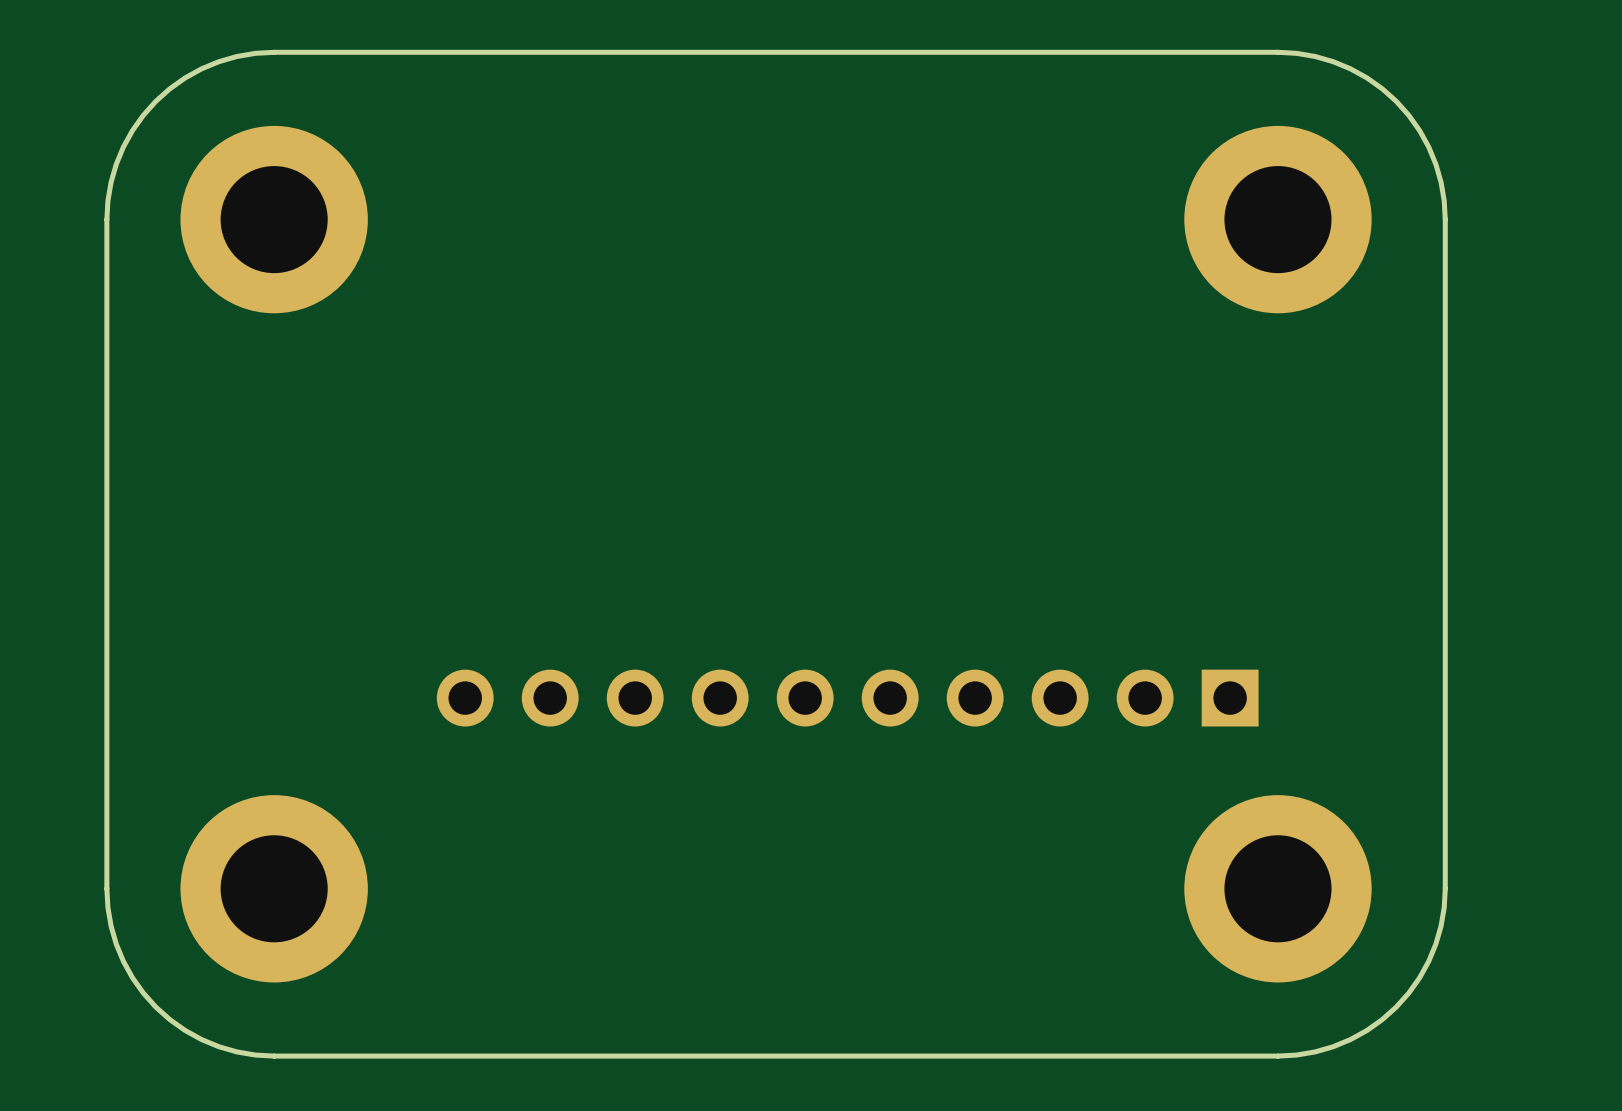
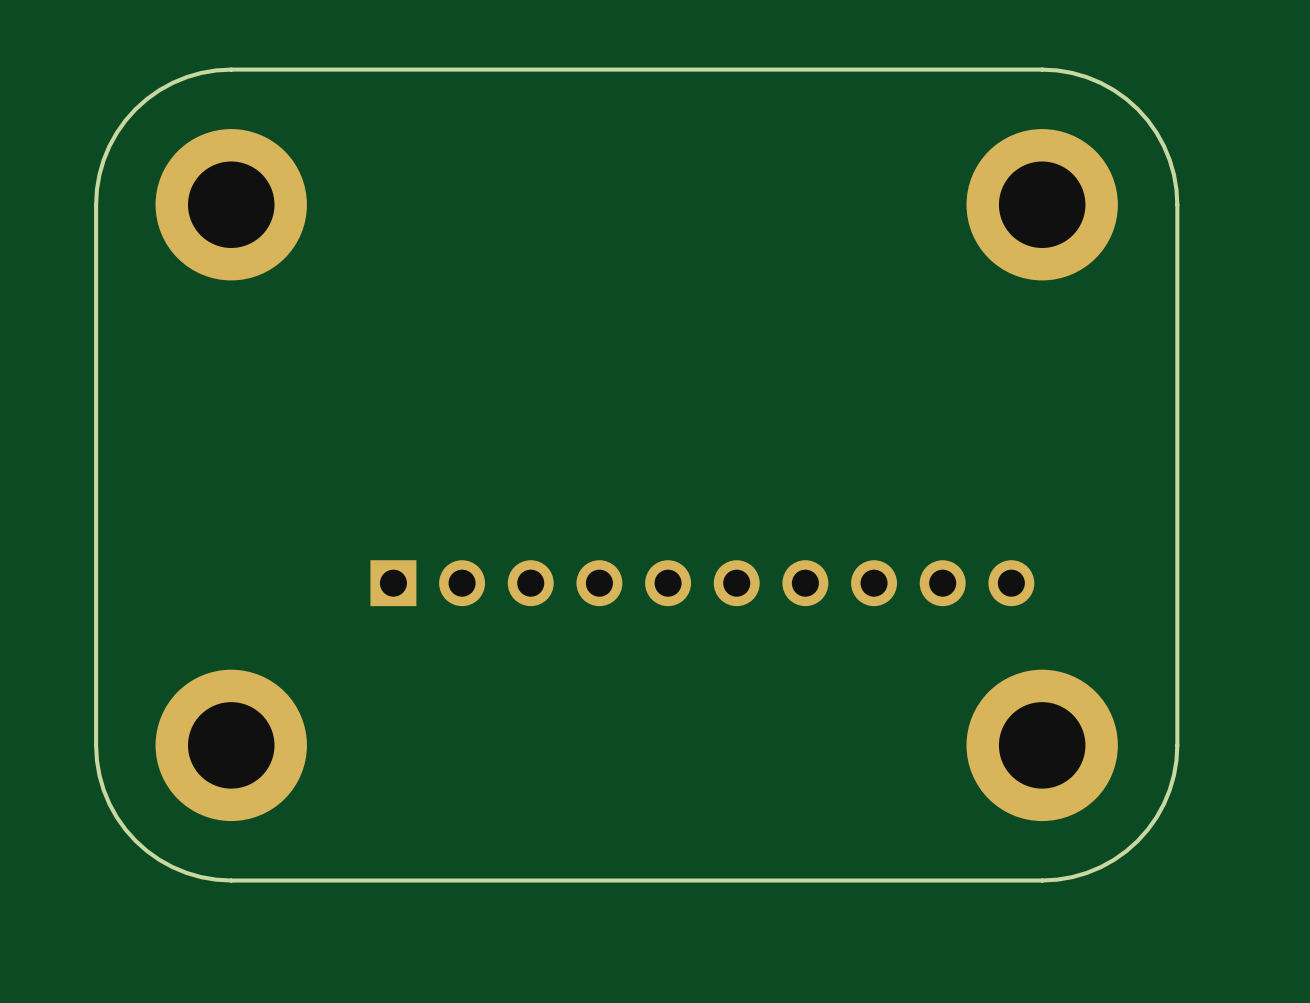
part rotation: 0° (847, 698) -> 180° (702, 583)

